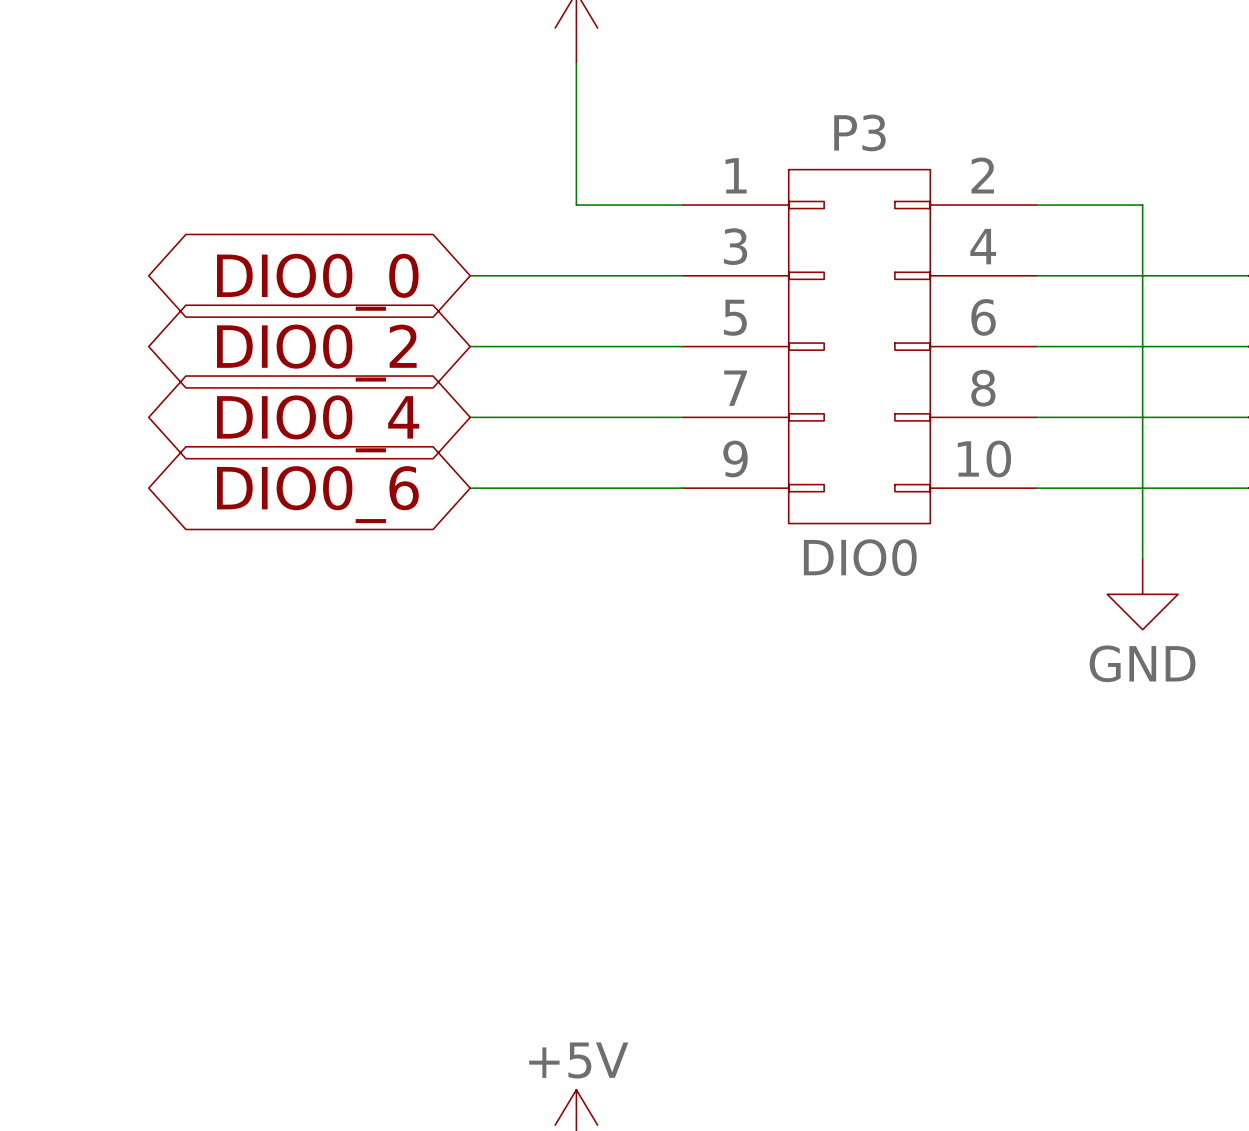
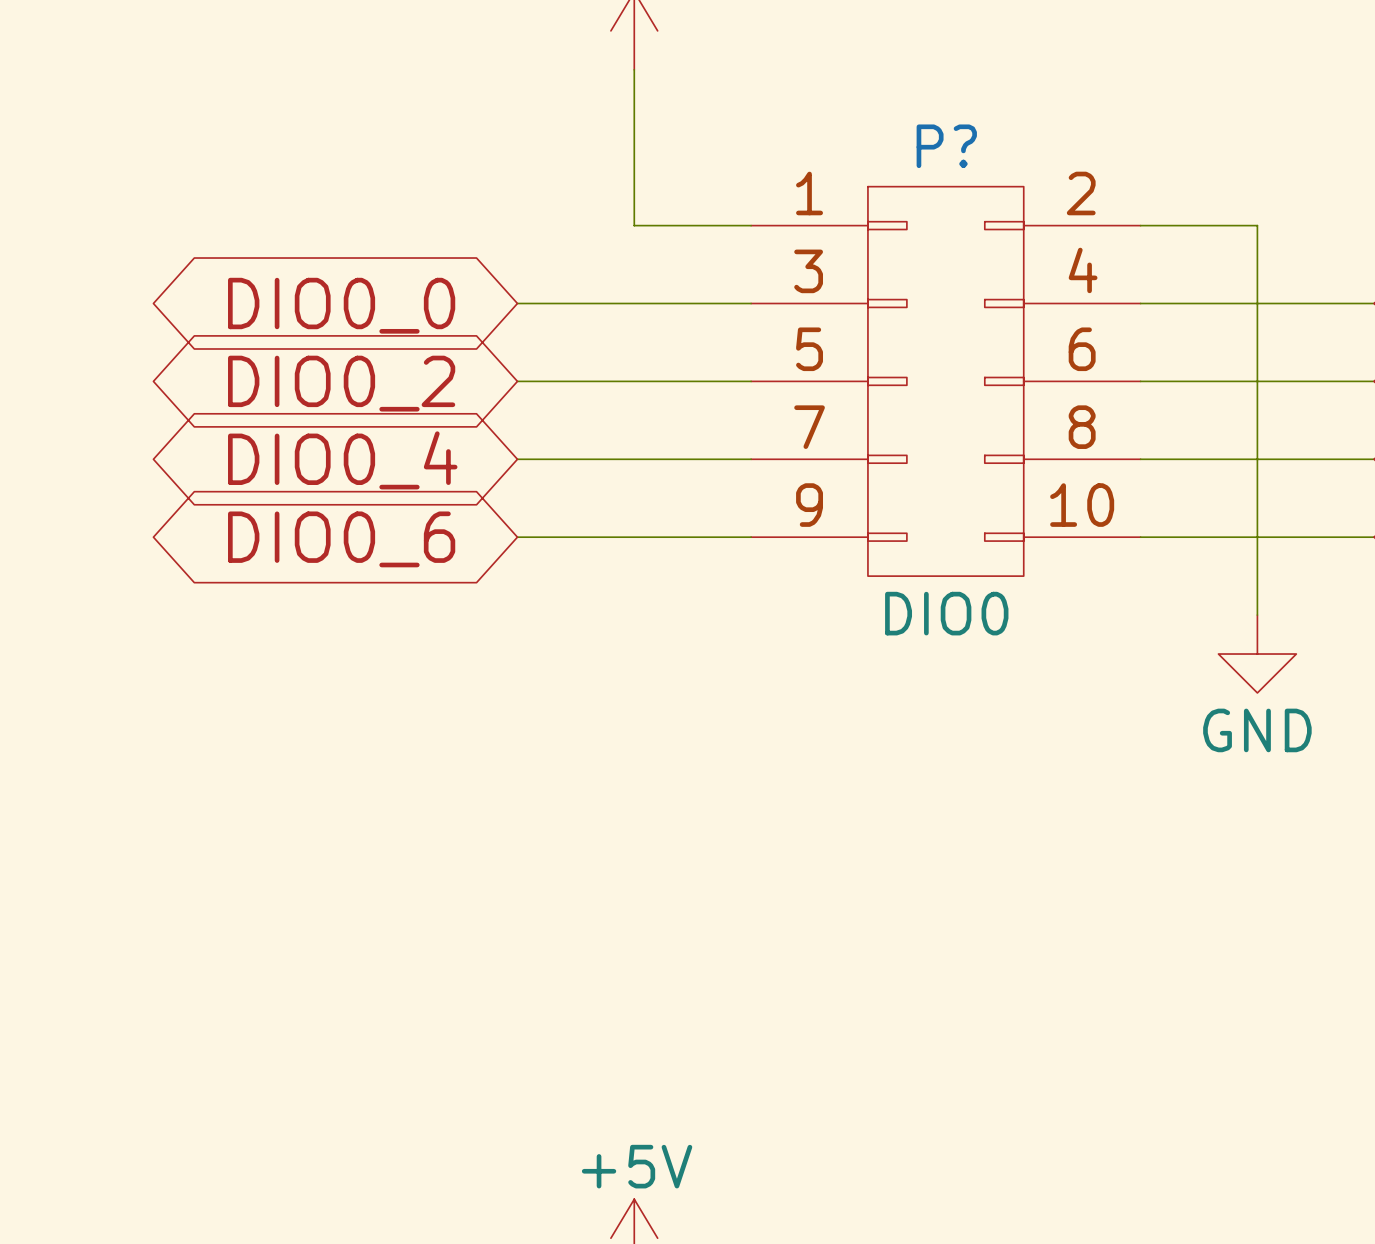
P3 name: P3 (859, 132) -> P? (946, 146)

